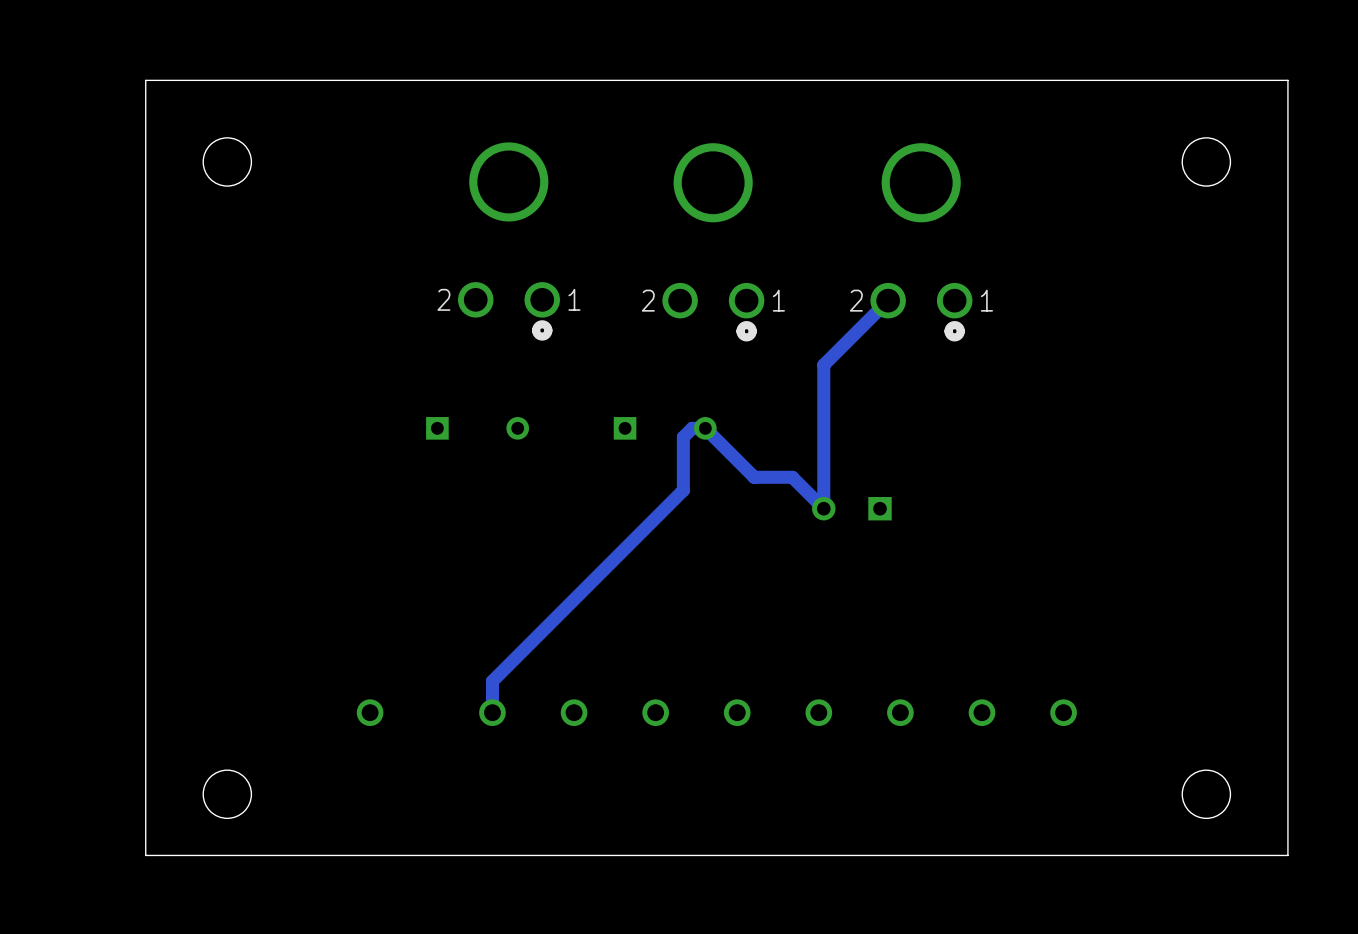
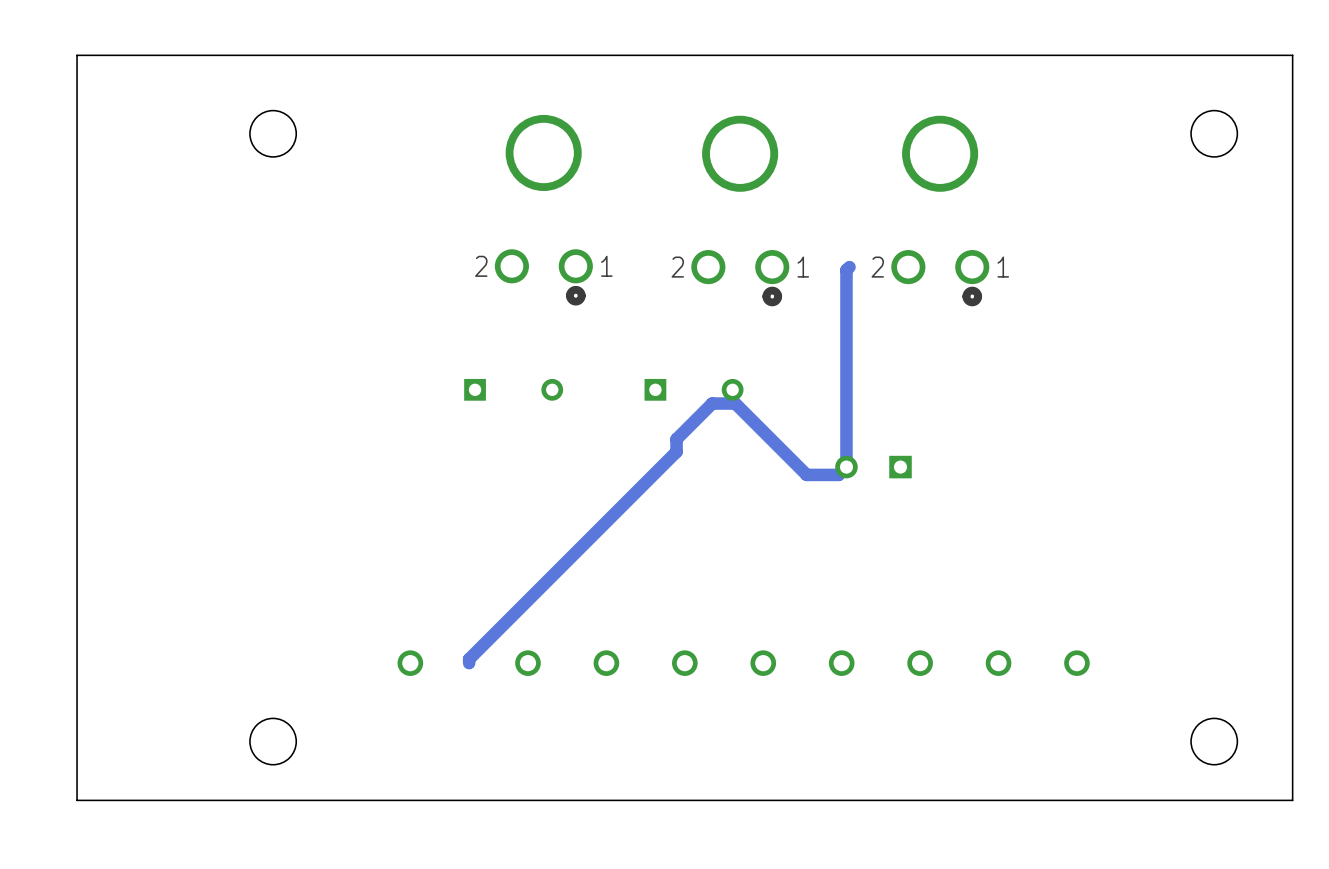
board edge: (145, 80) (145, 855) -> (194, 55) (77, 55) (77, 800) (194, 800)
track: (888, 300) (823, 365) -> (849, 267) (846, 270) (846, 328)
track: (823, 508) (792, 477) (754, 477) (705, 428) (692, 428) (683, 437) (683, 490) (492, 681) (492, 712) -> (846, 467) (838, 474) (806, 474) (735, 403) (712, 403) (676, 439) (676, 451) (469, 659) (469, 663)

